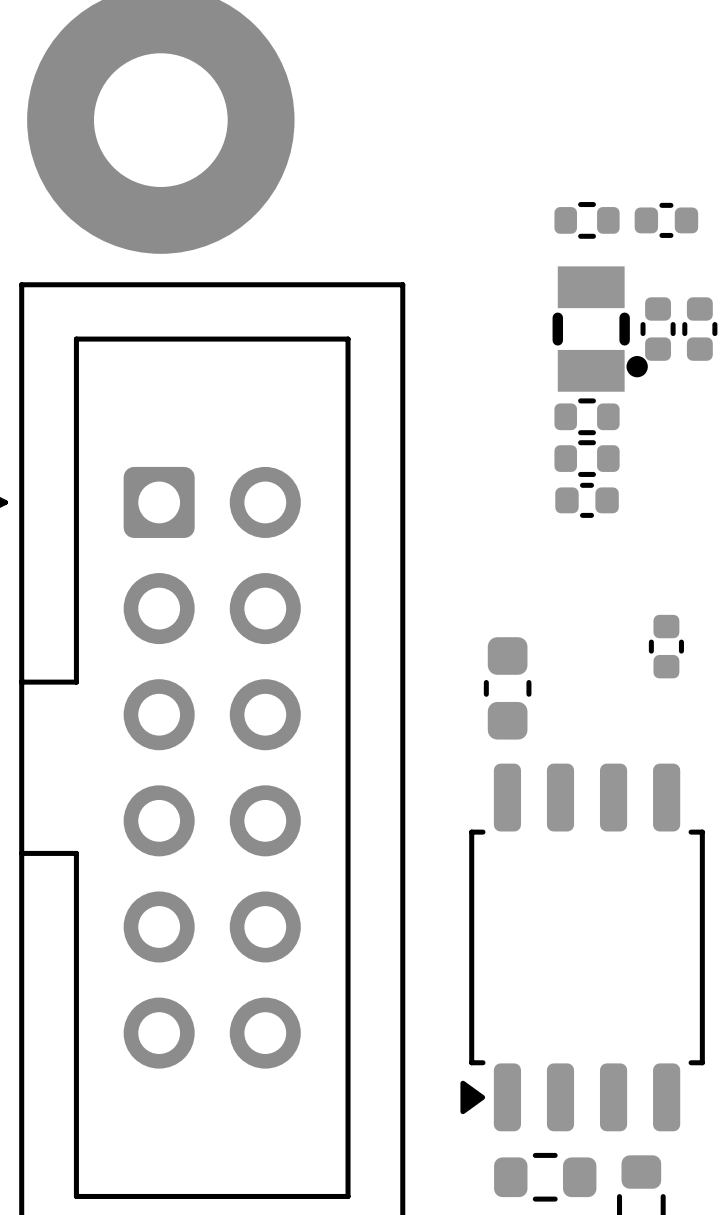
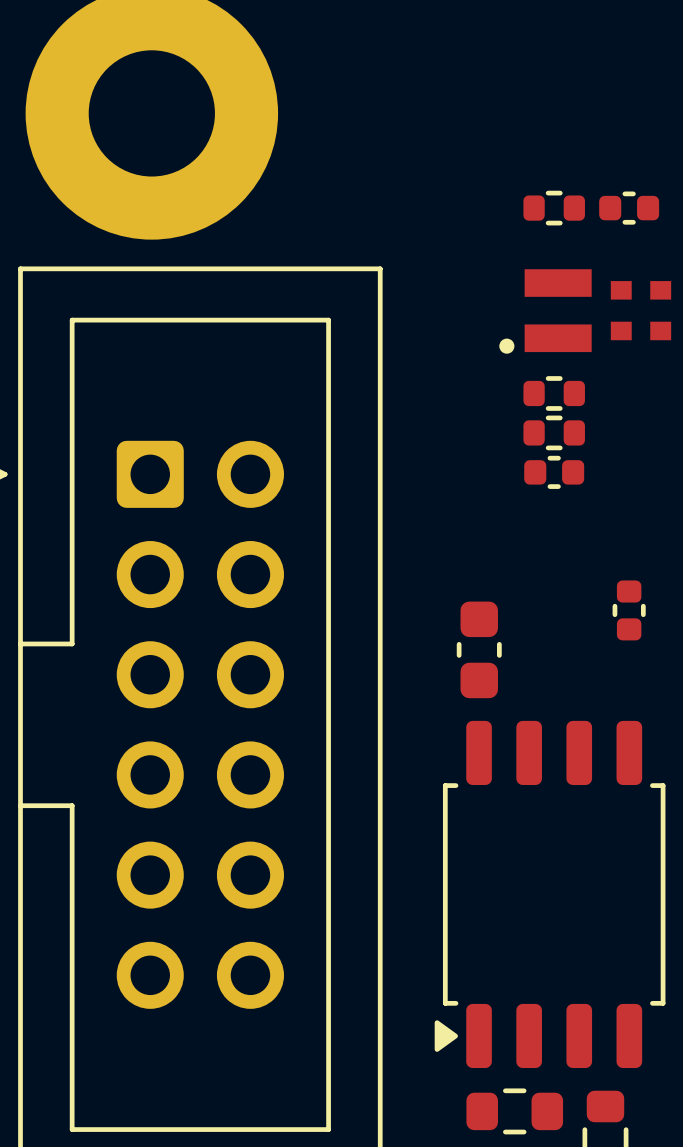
part footprint: [552, 266, 648, 392] -> [499, 269, 592, 354]
part footprint: [640, 297, 676, 361] -> [610, 281, 632, 341]
part footprint: [682, 297, 718, 361] -> [650, 281, 672, 341]

